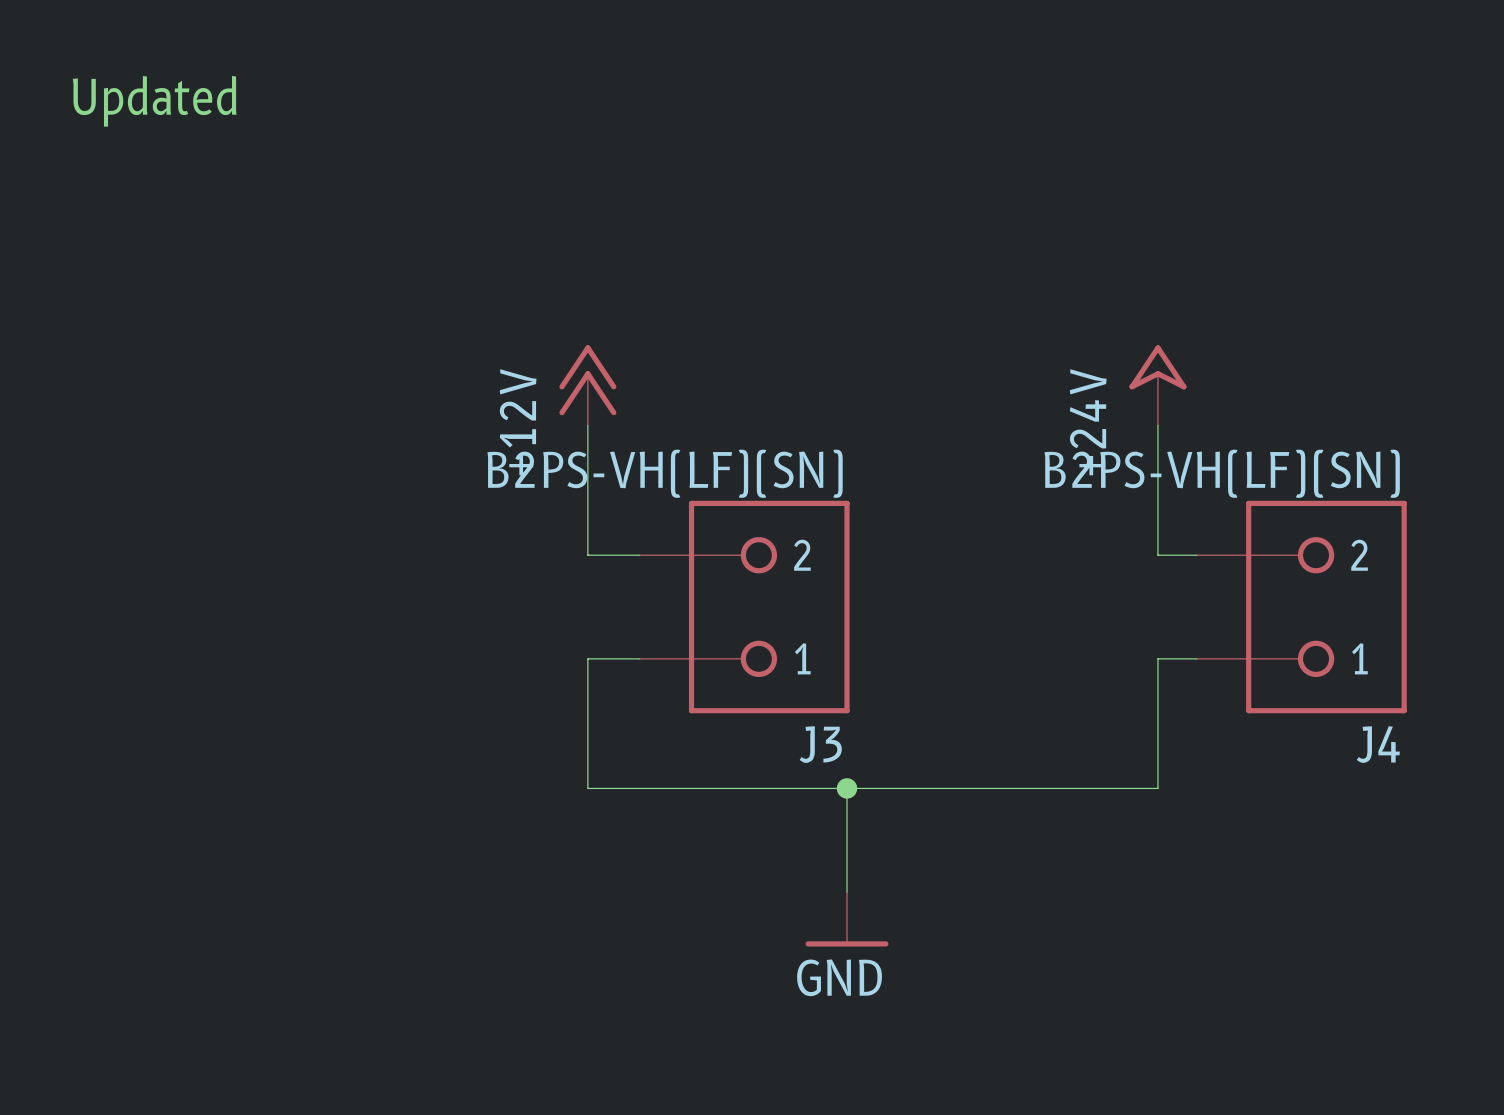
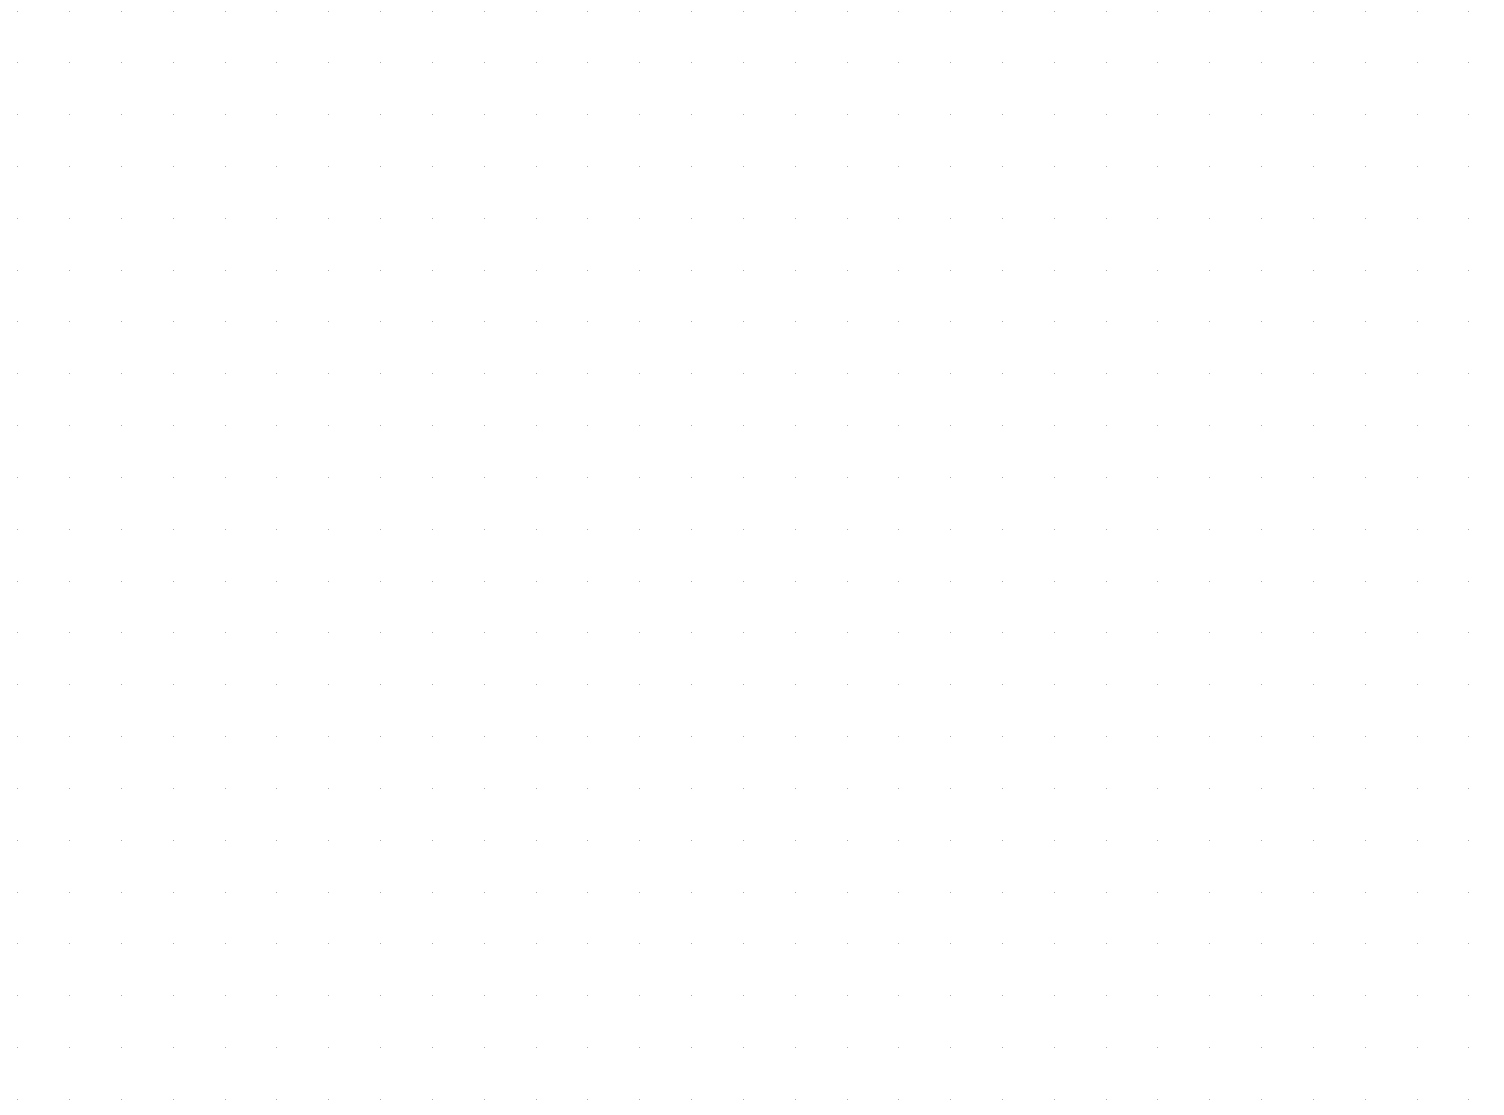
text: Updated (154, 101) -> none
power symbol: +12V (587, 385) -> none
power symbol: +24V (1157, 385) -> none
wire: (587, 425) (587, 555) (639, 555) -> none
wire: (1157, 425) (1157, 555) (1196, 555) -> none
J3: B2PS-VH(LF)(SN) (744, 607) -> none
J4: B2PS-VH(LF)(SN) (1301, 607) -> none
wire: (639, 658) (587, 658) (587, 788) (1157, 788) (1157, 658) (1196, 658) -> none
wire: (847, 788) (847, 892) -> none
junction: (847, 788) -> none
power symbol: GND (847, 919) -> none

